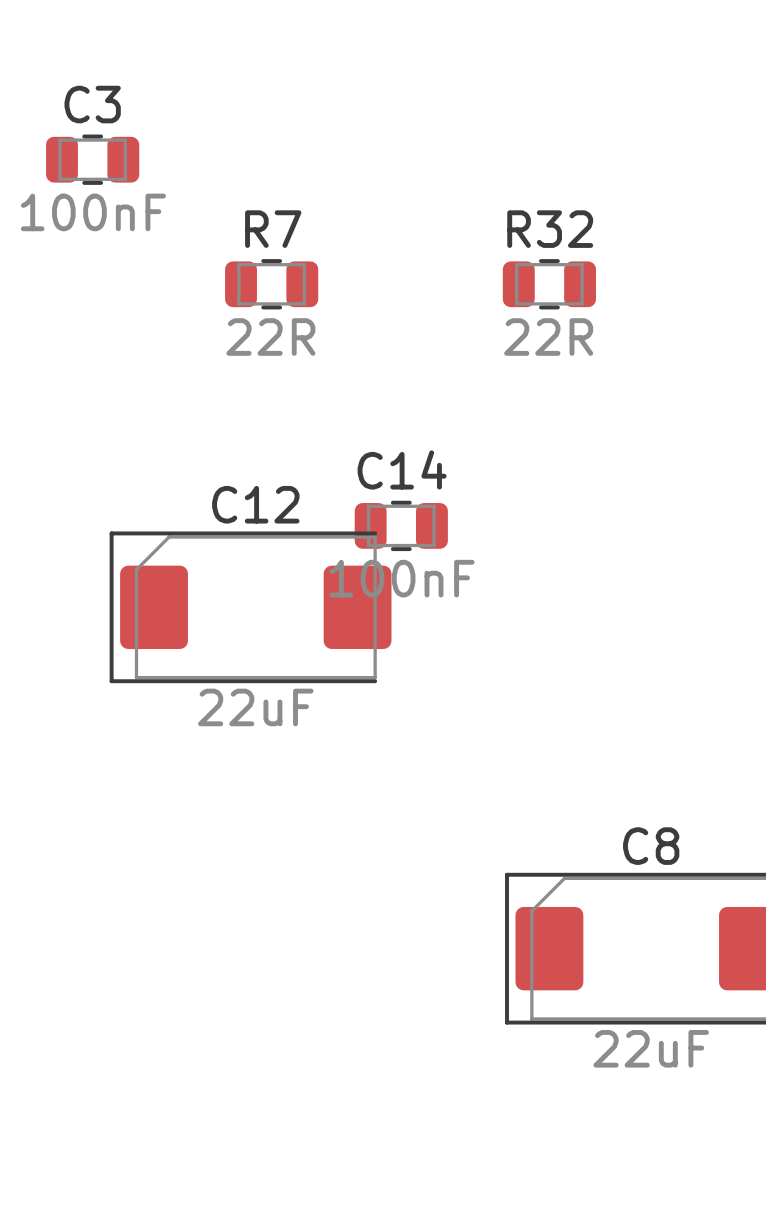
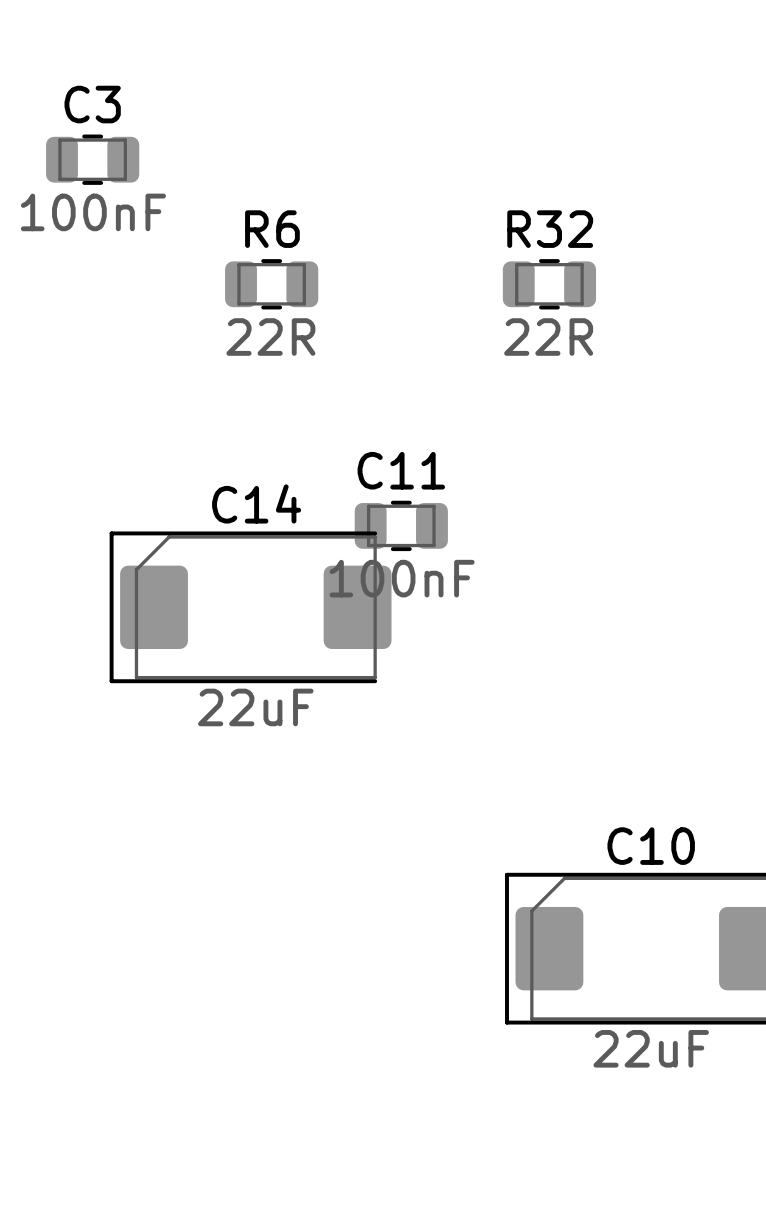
R7 name: R7 (273, 229) -> R6 (272, 229)
C14 name: C14 (402, 469) -> C11 (401, 470)
C12 name: C12 (255, 504) -> C14 (256, 503)
C8 name: C8 (651, 846) -> C10 (651, 846)

